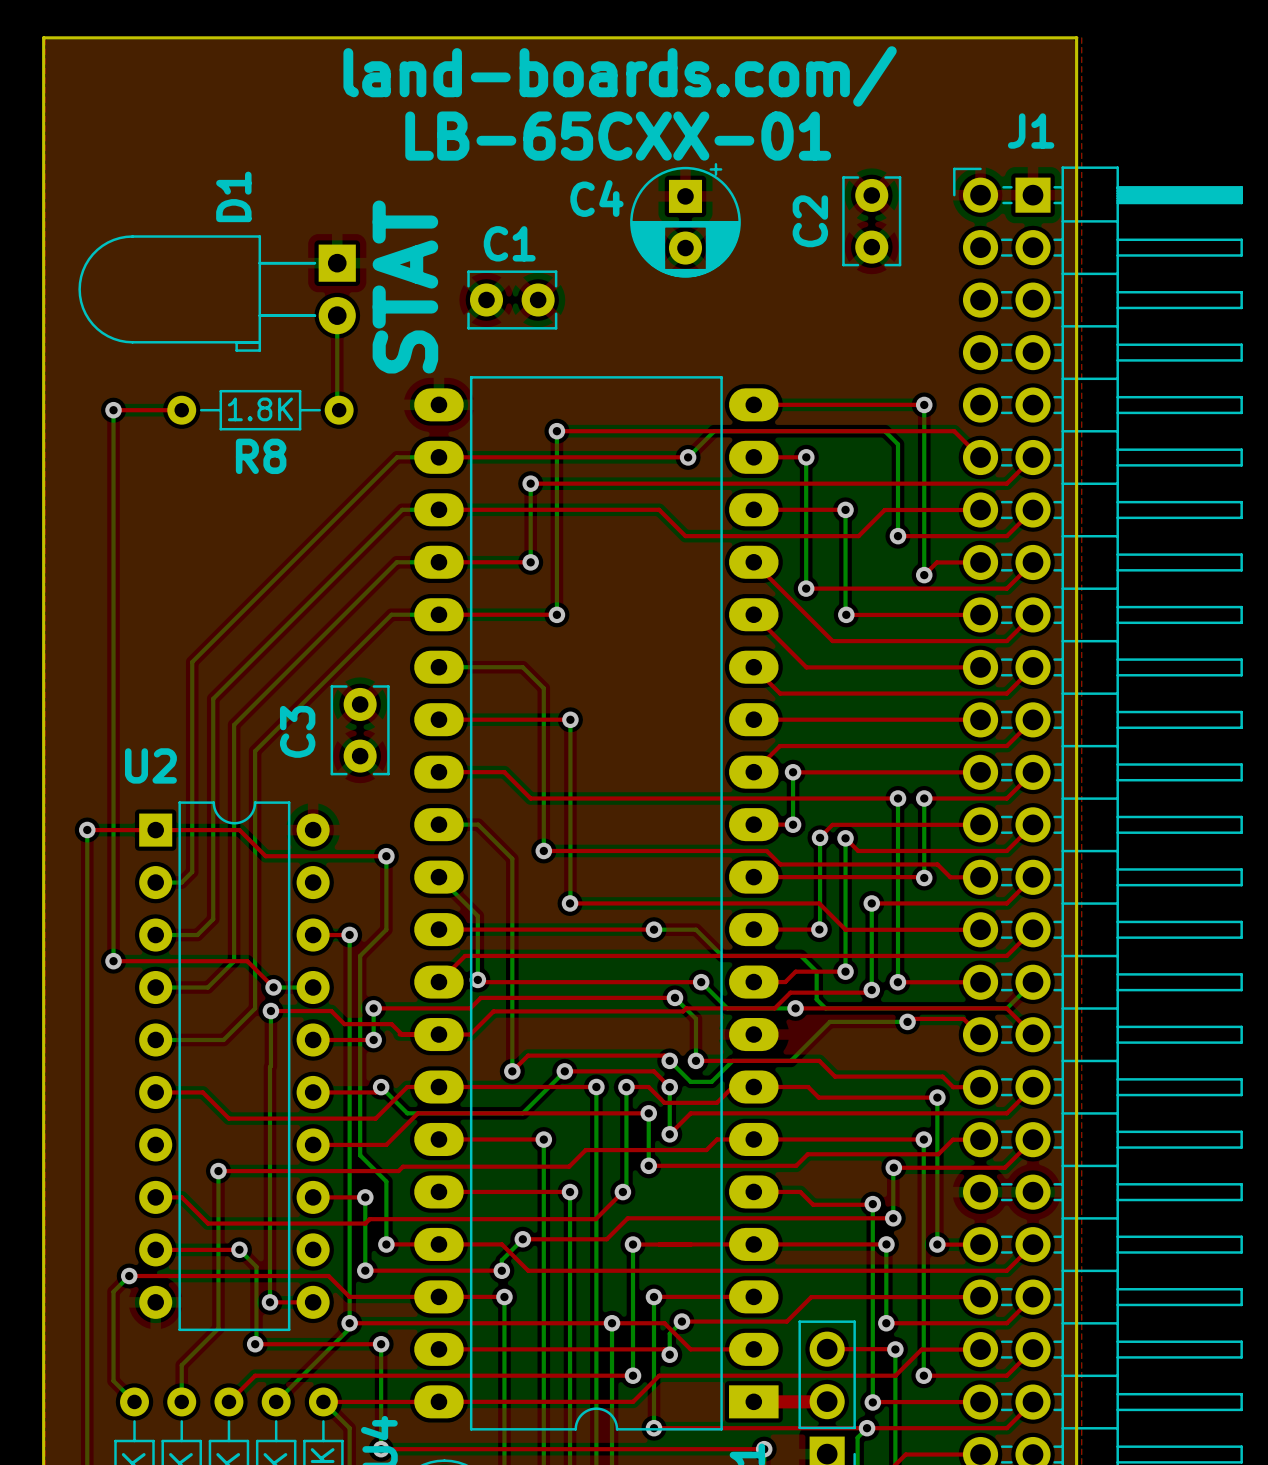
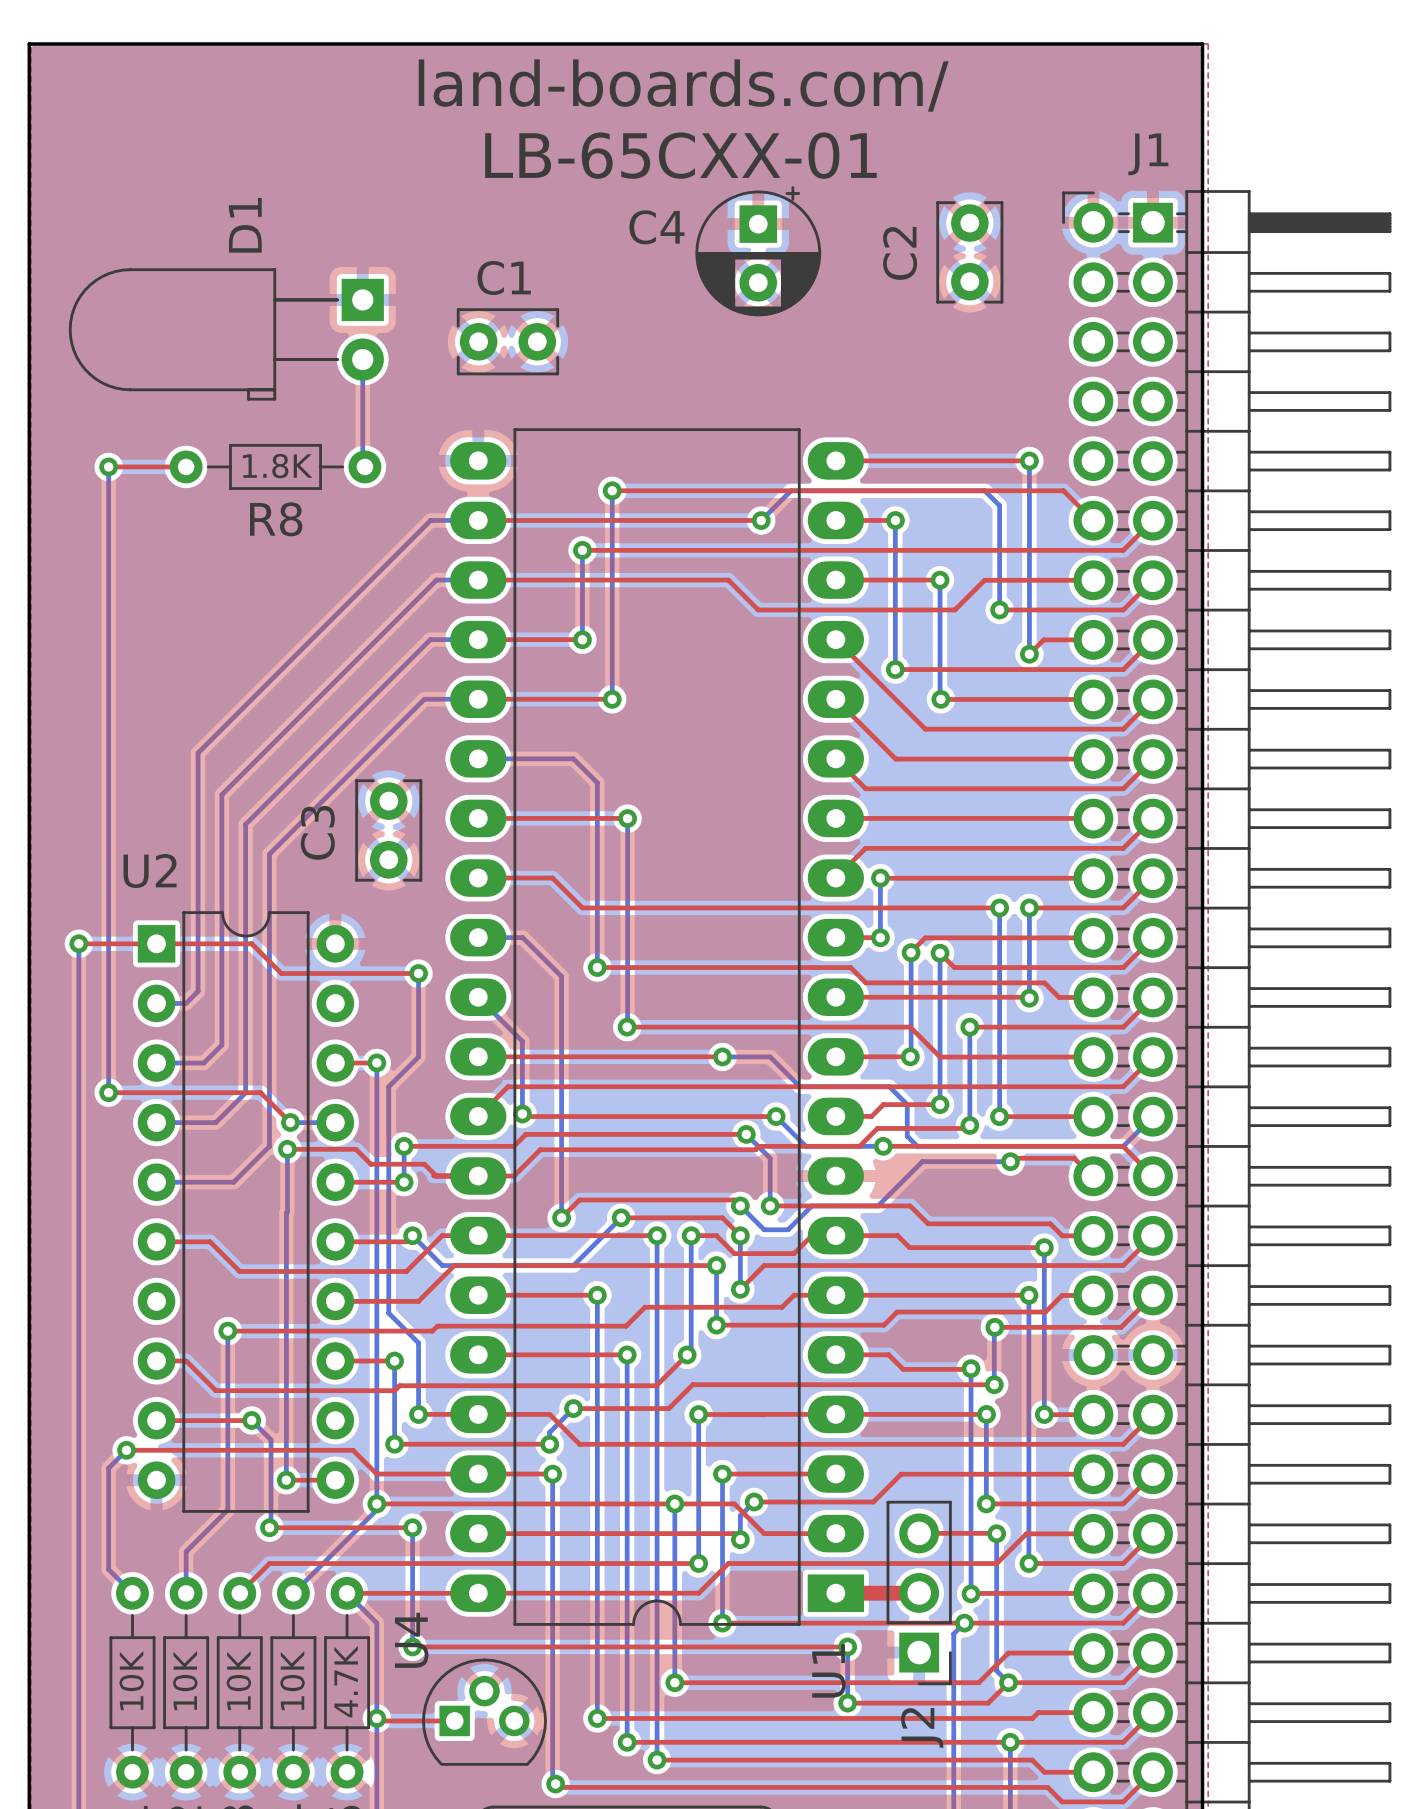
text: STAT (405, 287) -> none
C1 position: (512, 300) -> (507, 341)

